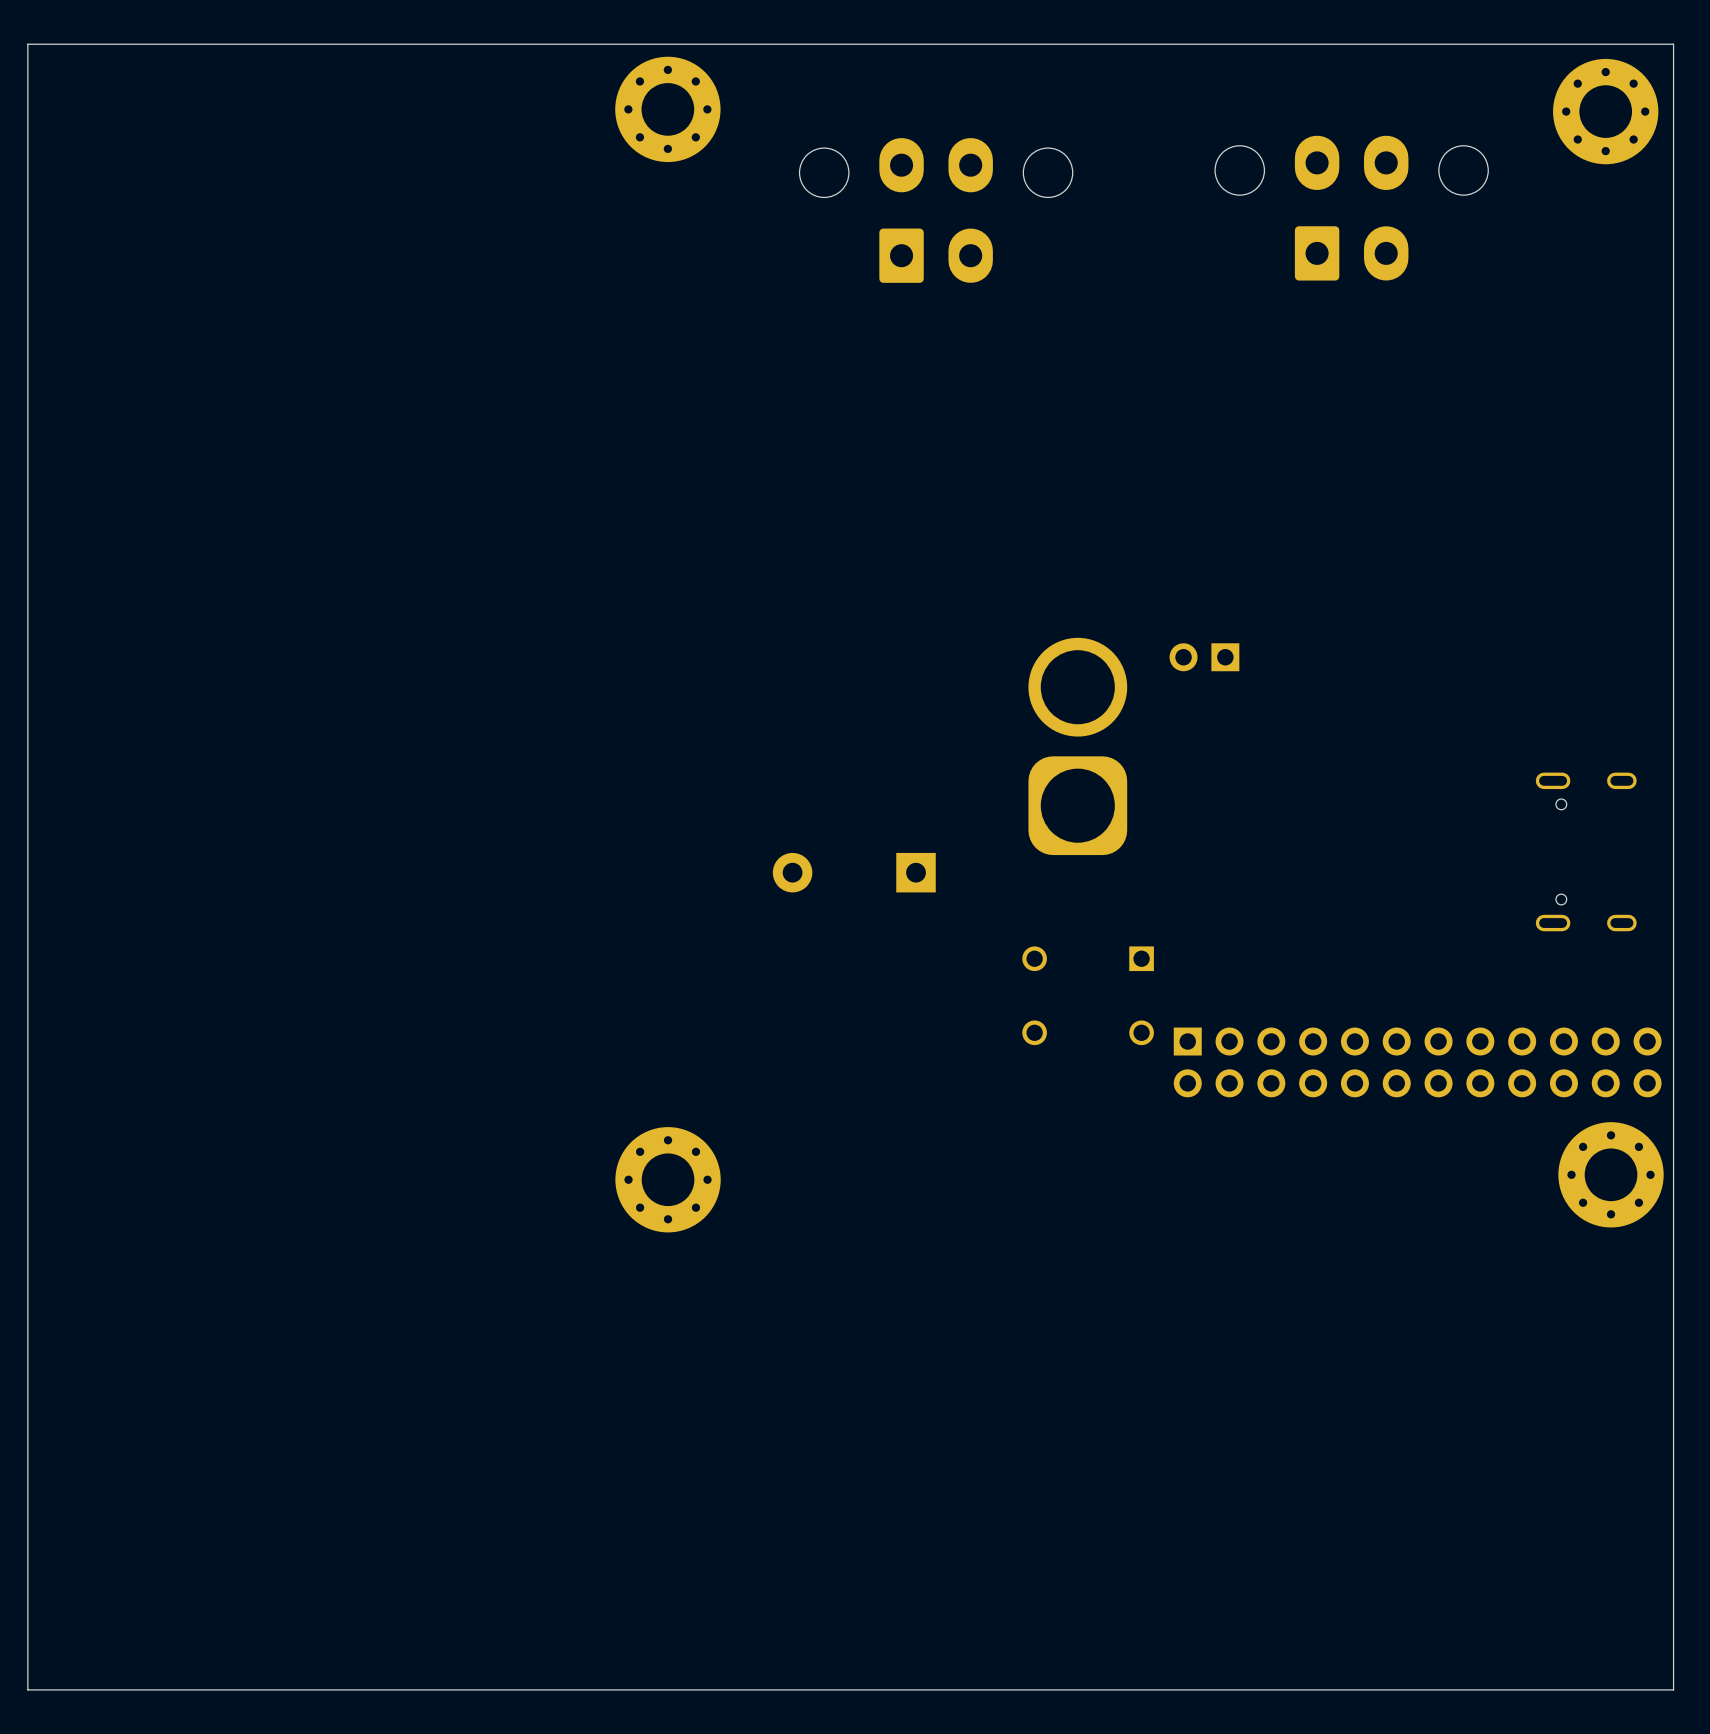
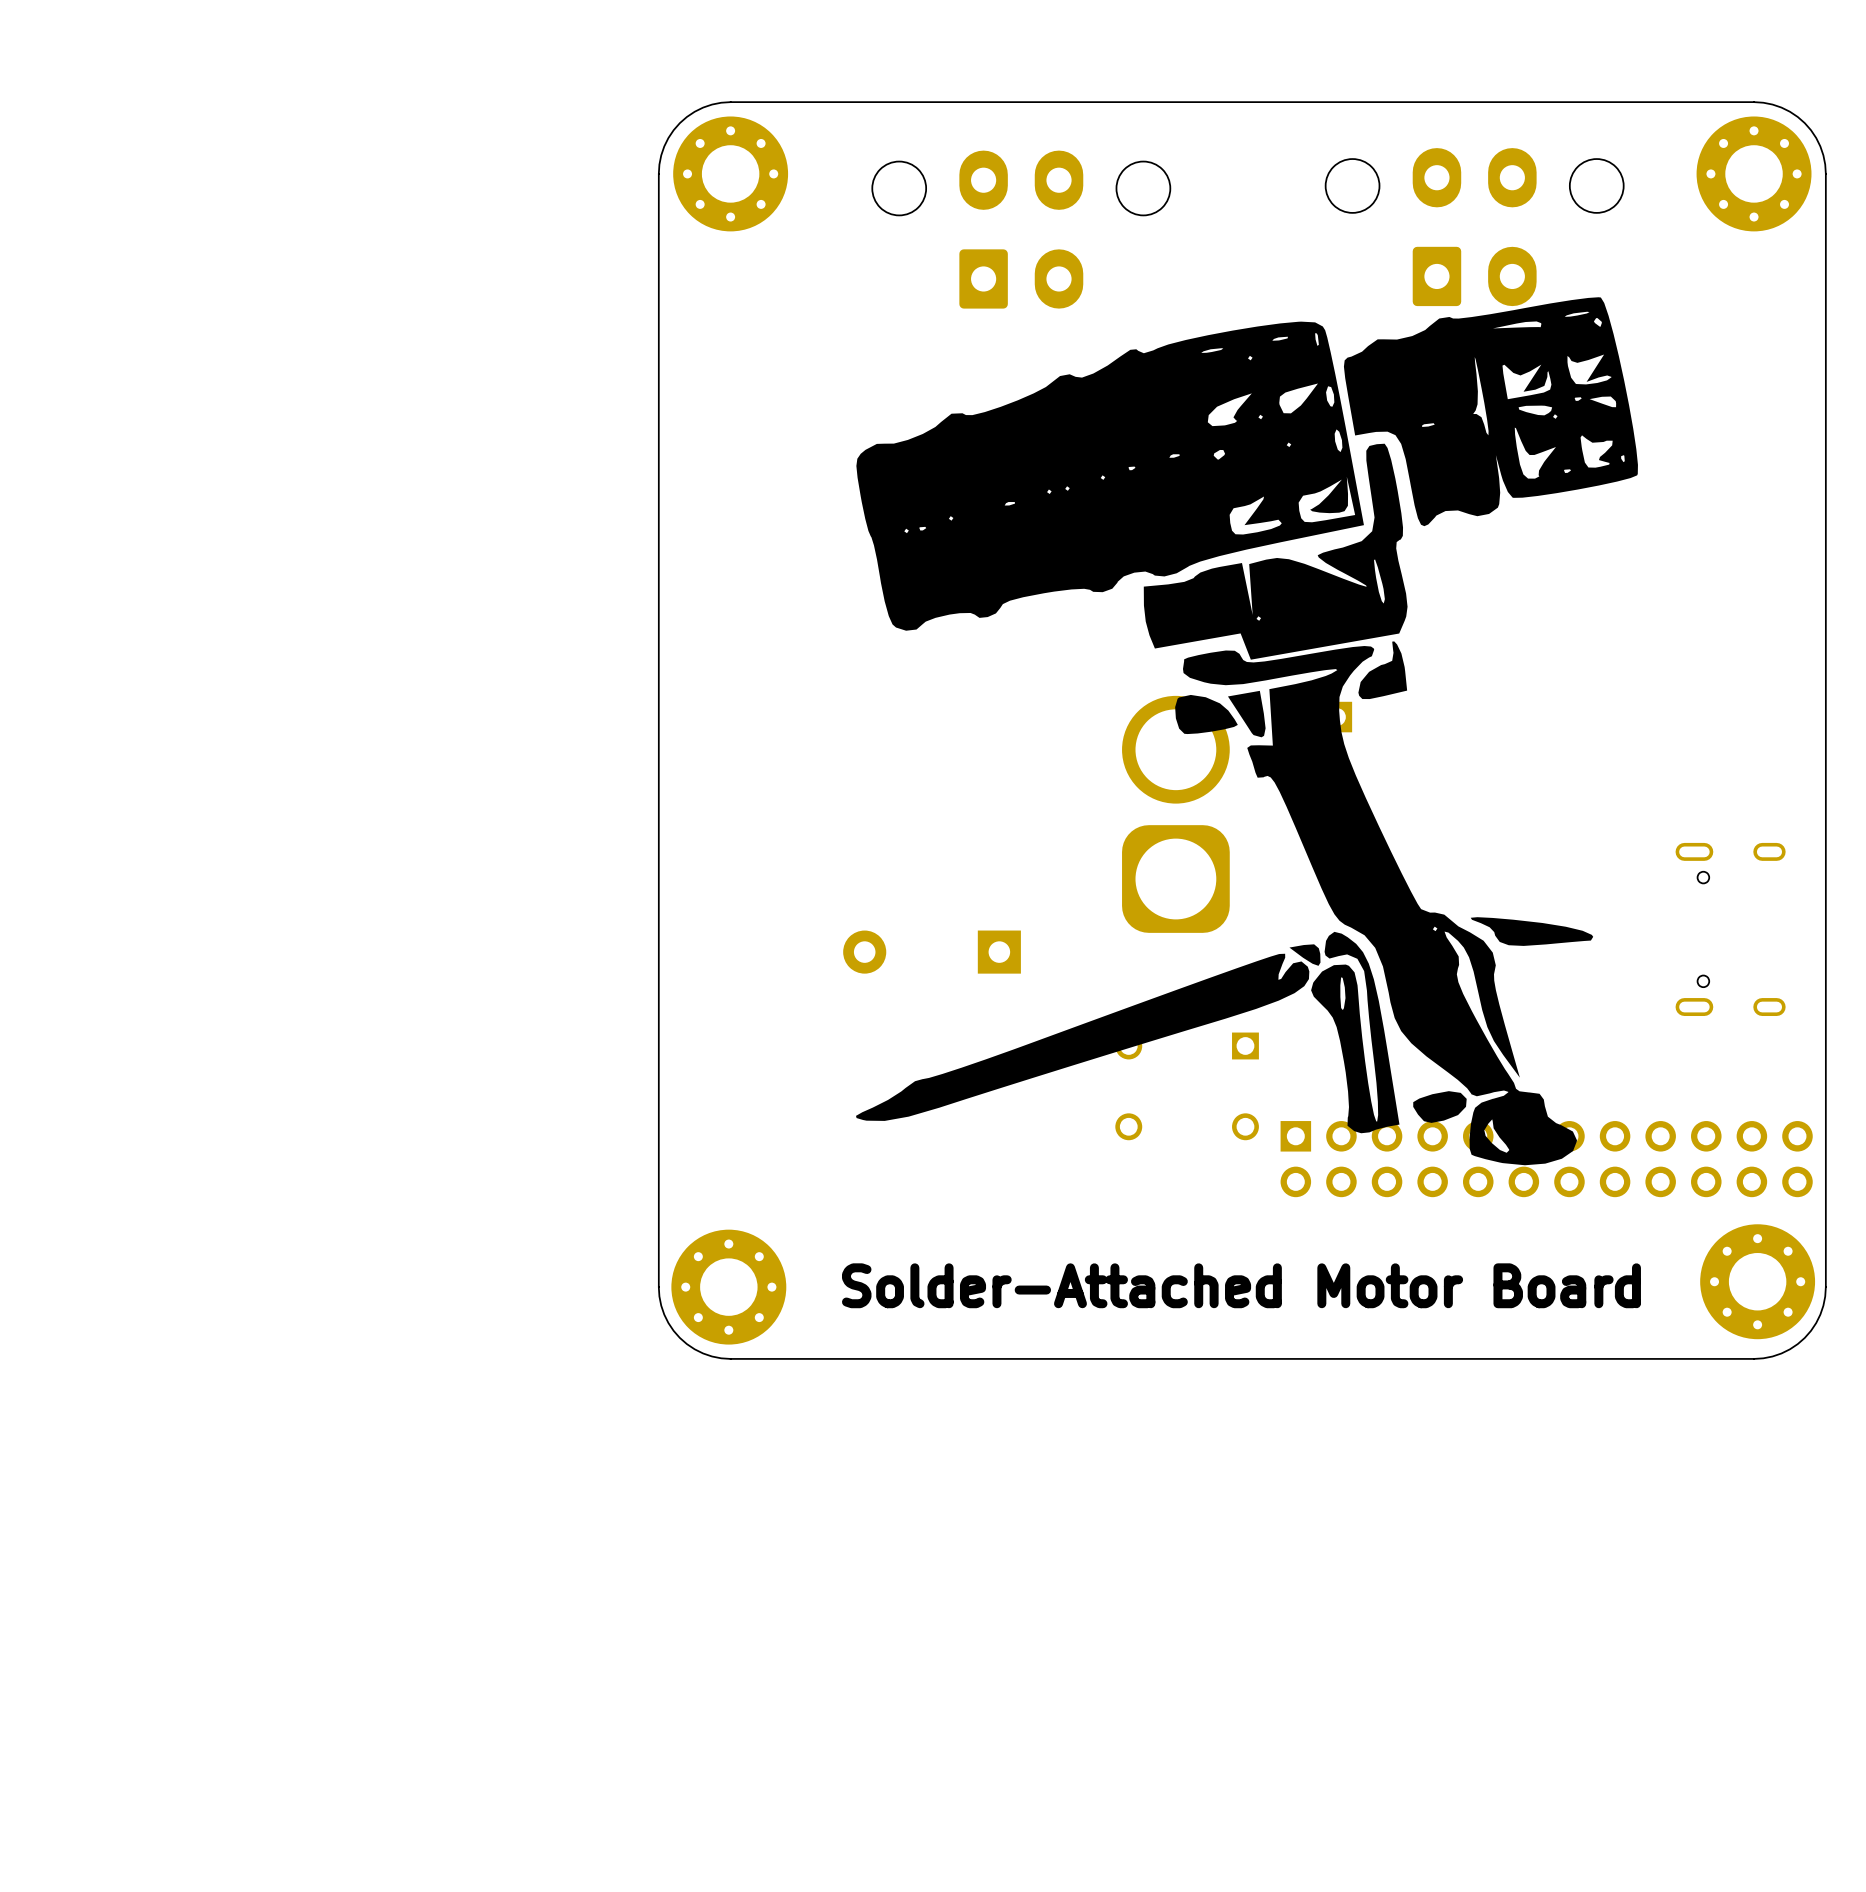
part position: (667, 109) -> (730, 173)
part position: (1605, 111) -> (1754, 173)
board edge: (1673, 159) (1673, 44) (27, 44) (27, 1689) (1673, 1689) (1673, 1179) -> (1825, 173) (1820, 146) (1804, 123) (1781, 107) (1754, 102) (721, 102) (694, 111) (679, 123) (664, 146) (658, 173) (658, 1287) (664, 1314) (679, 1337) (703, 1353) (730, 1358) (1754, 1358) (1781, 1353) (1804, 1337) (1820, 1314) (1825, 1287)
drawing: none -> [855, 297, 1638, 1166]
text: none -> Solder-Attached Motor Board (1241, 1285)

